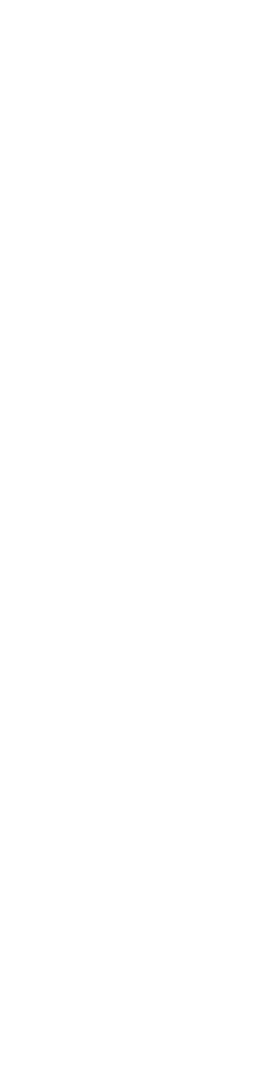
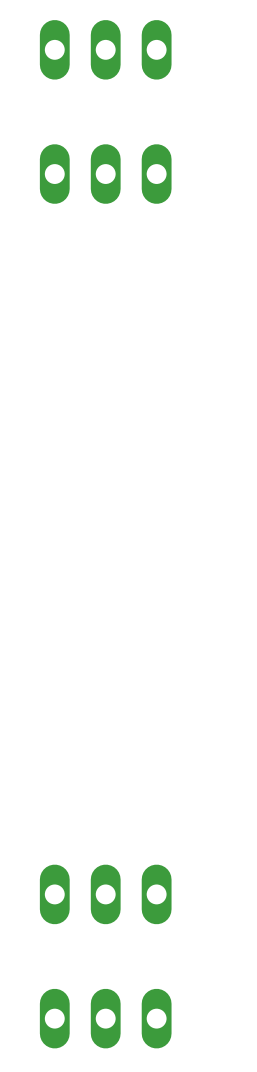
part: none -> (105, 49)
part: none -> (105, 174)
part: none -> (105, 894)
part: none -> (105, 1018)

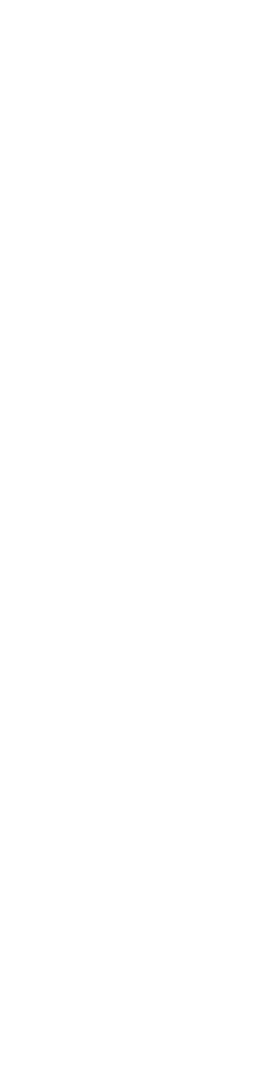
part: (105, 49) -> none
part: (105, 174) -> none
part: (105, 894) -> none
part: (105, 1018) -> none

